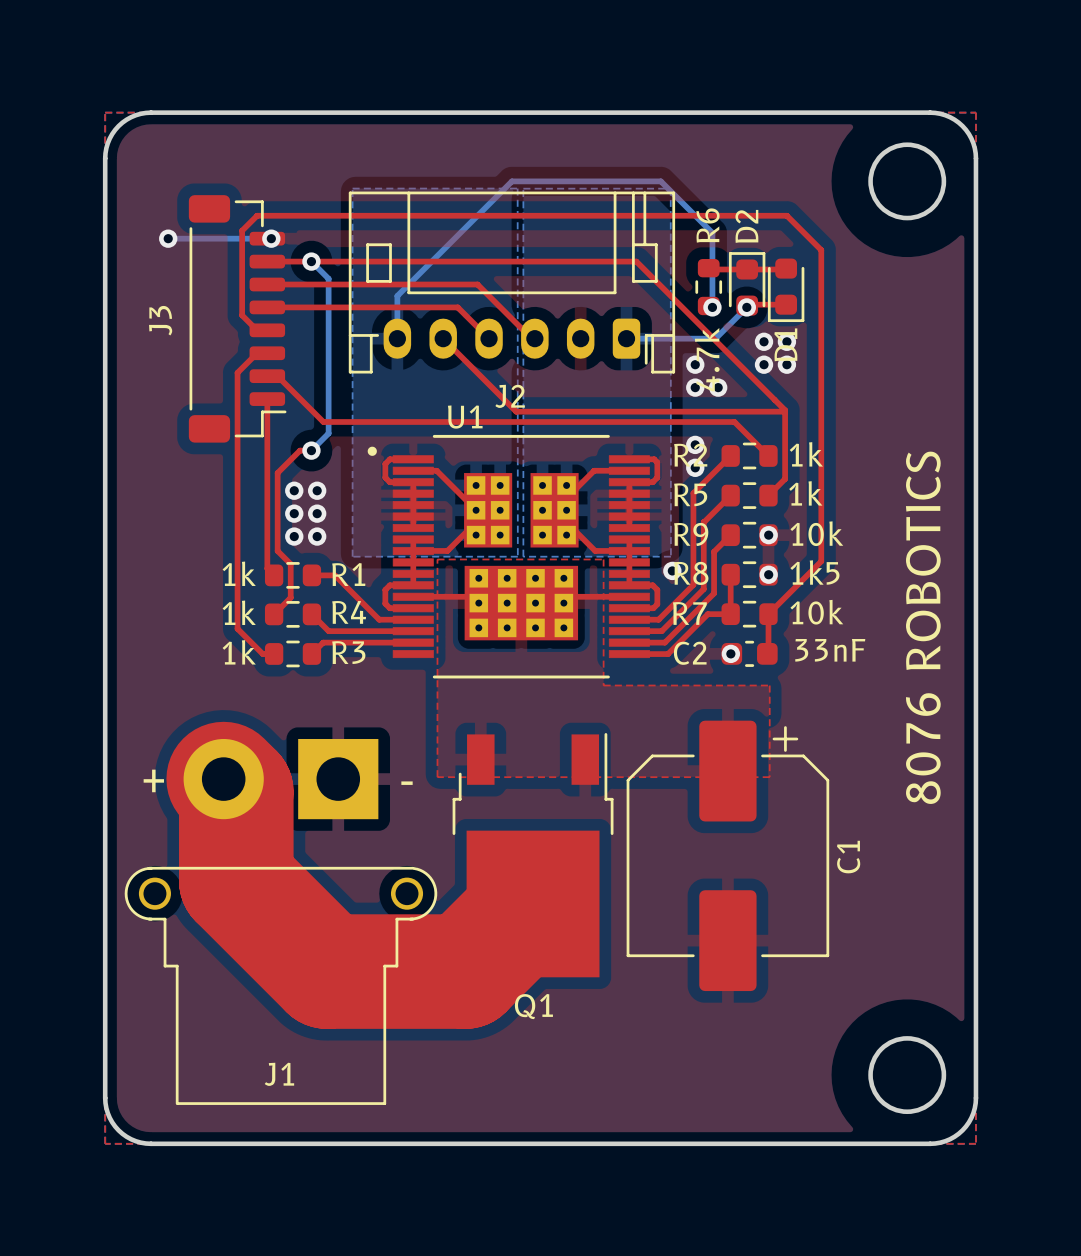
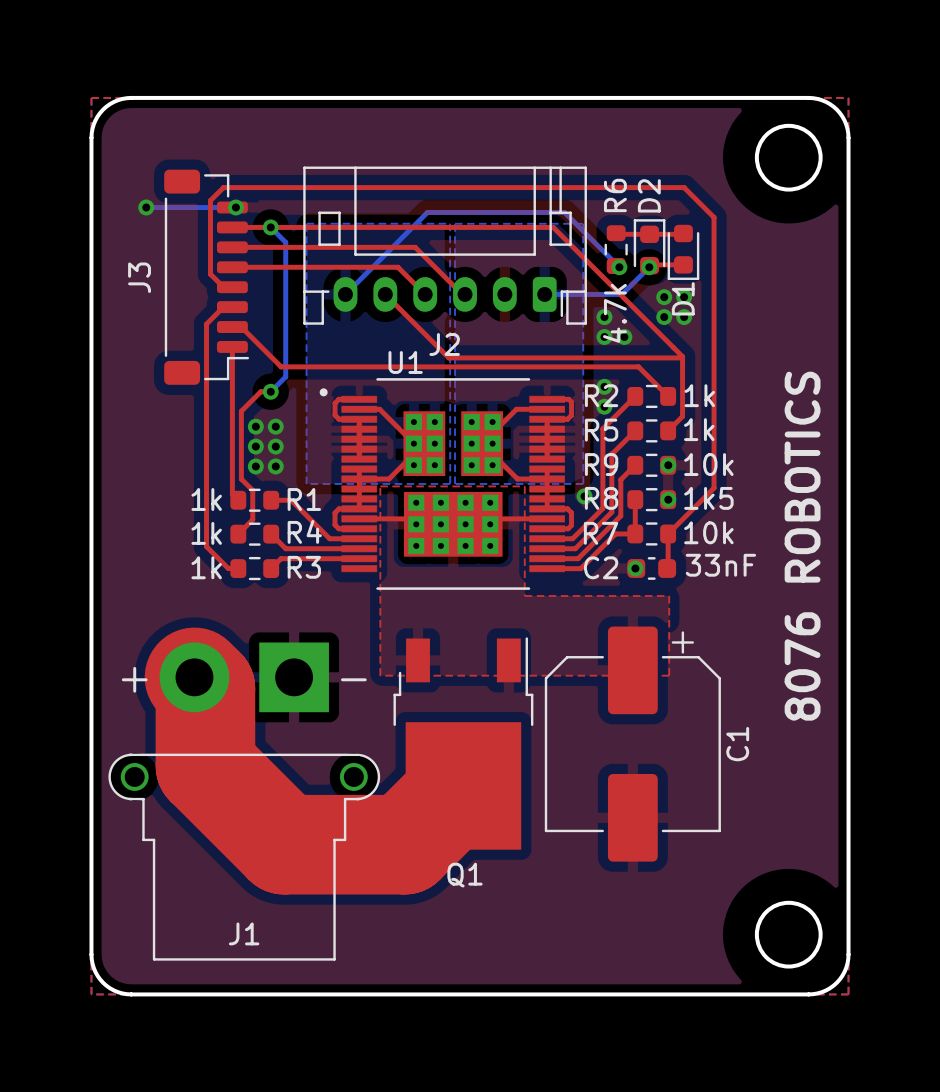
bottom zone outline: (352, 257) (352, 188) (517, 188) (517, 556) -> (306, 223) (450, 223) (450, 483)
bottom track: (712, 307) (712, 232) (660, 181) (511, 181) (397, 295) (397, 338) -> (619, 267) (564, 212) (427, 212) (345, 294)
bottom zone outline: (523, 556) (523, 188) (670, 188) (670, 556) -> (455, 483) (455, 223) (583, 223) (583, 483)

